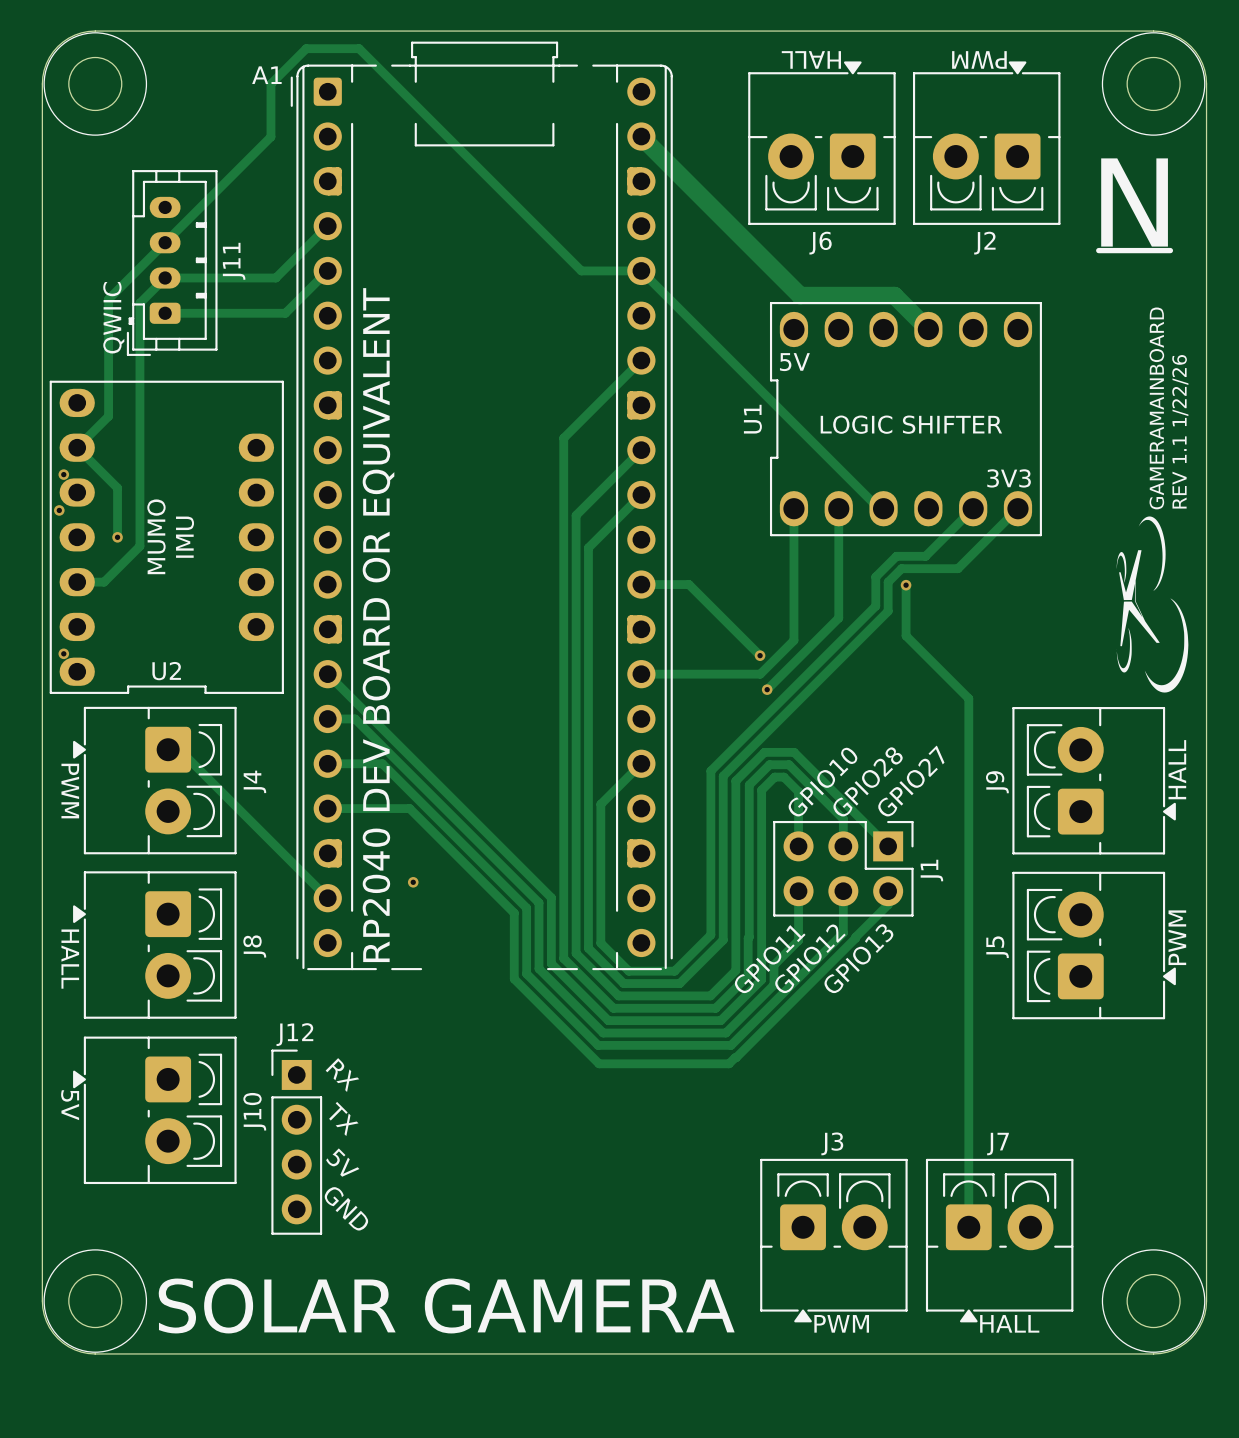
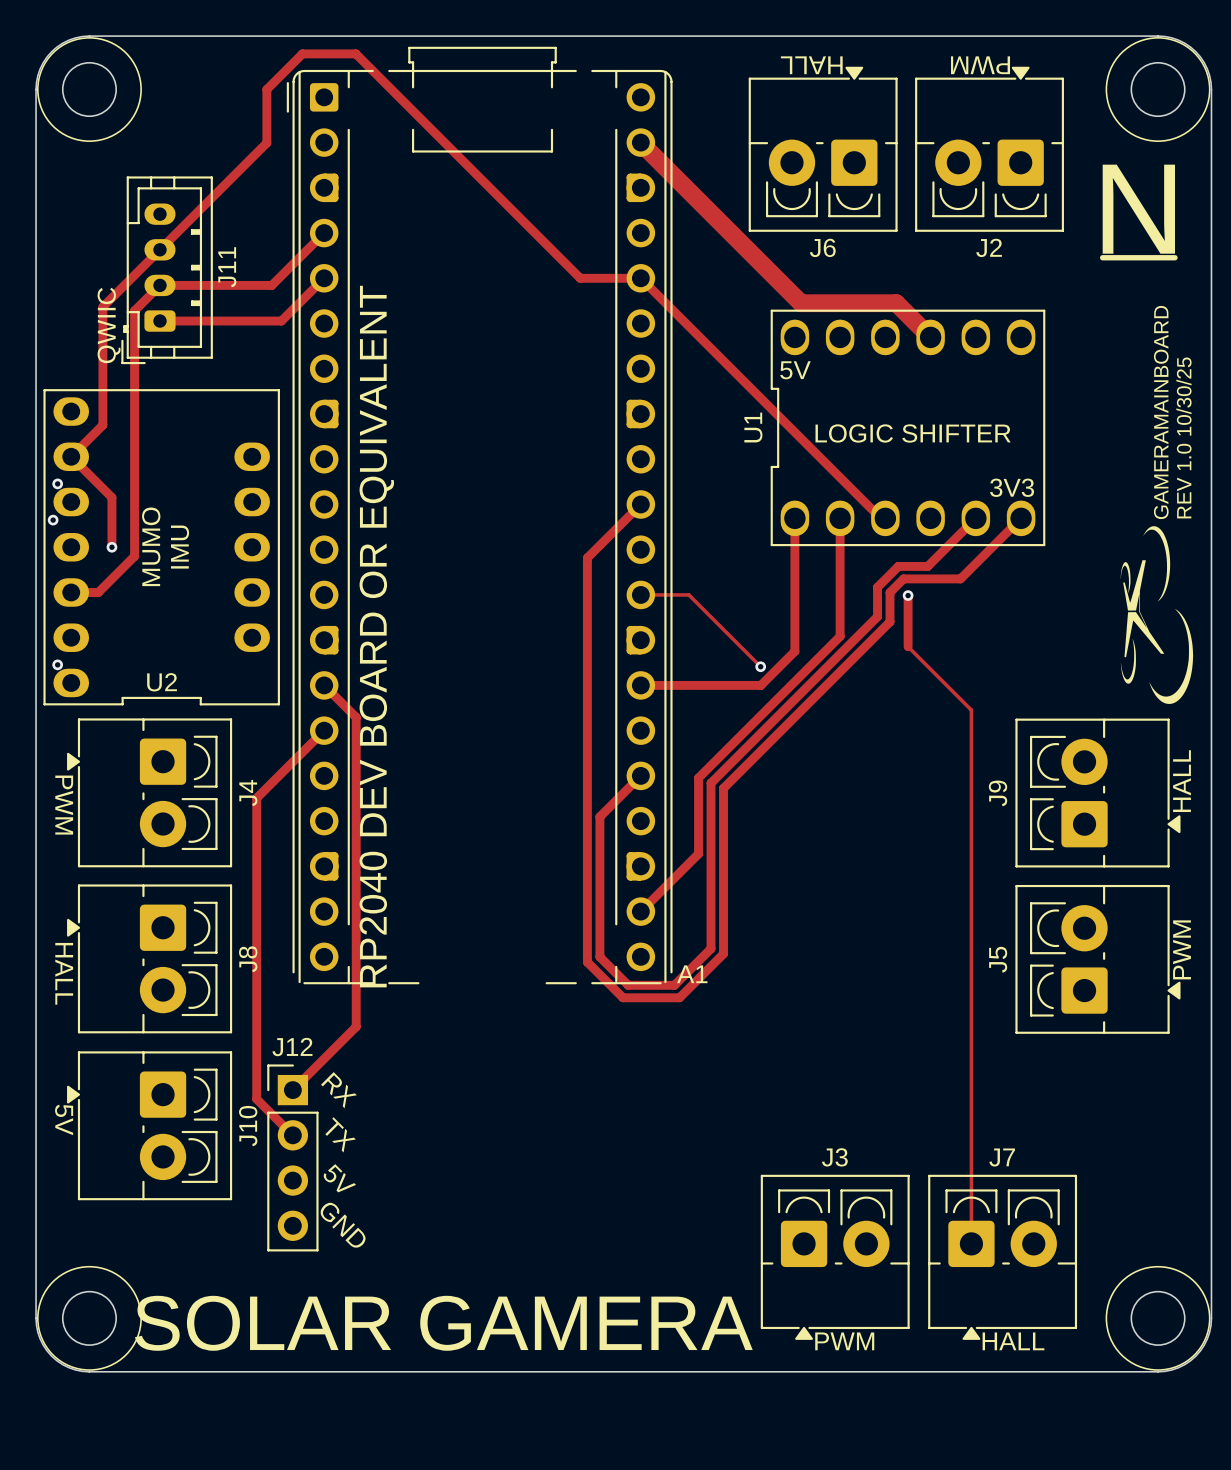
A1 name position: A1 (266, 75) -> A1 (692, 974)
track: (641, 360) (563, 438) (563, 958) (613, 1008) (715, 1008) (748, 975) (749, 785) (769, 764) (789, 764) (843, 819) (843, 846) -> none
text: REV 1.1 1/22/26 (1180, 431) -> REV 1.0 10/30/25 (1183, 437)
track: (641, 450) (576, 515) (576, 953) (618, 995) (710, 995) (735, 970) (735, 781) (764, 752) (794, 752) (888, 846) -> none
track width: thick (641, 584) (688, 584) (760, 655) -> thin (640, 594) (688, 594) (760, 666)
track: (838, 618) (767, 689) -> (840, 628) (840, 636) (698, 778) (698, 853) (640, 911)
track width: thick (906, 635) (968, 698) (968, 1227) -> thin (908, 646) (971, 710) (971, 1243)
via: (767, 689) -> none
track: (359, 705) (551, 897) (551, 963) (608, 1020) (720, 1020) (761, 979) (761, 790) (774, 777) (783, 777) (798, 791) (798, 846) -> (356, 717) (356, 1026) (292, 1090)
track: (327, 718) (355, 718) (539, 902) (539, 968) (603, 1033) (725, 1033) (773, 984) (773, 965) (798, 940) (798, 891) -> (324, 730) (256, 798) (256, 1099) (292, 1135)
track: (168, 749) (179, 749) (327, 898) -> none
track: (327, 763) (382, 763) (526, 908) (526, 973) (598, 1045) (731, 1045) (843, 933) (843, 891) -> none
text: GPIO10 (823, 781) -> none
text: GPIO28 (868, 781) -> none
text: GPIO27 (911, 781) -> none
track: (327, 808) (409, 808) (514, 913) (514, 979) (599, 1063) (729, 1063) (888, 904) (888, 891) -> none
J1: (843, 868) -> none
via: (413, 882) -> none
text: GPIO12 (810, 958) -> none
text: GPIO13 (858, 958) -> none
text: GPIO11 (770, 959) -> none

